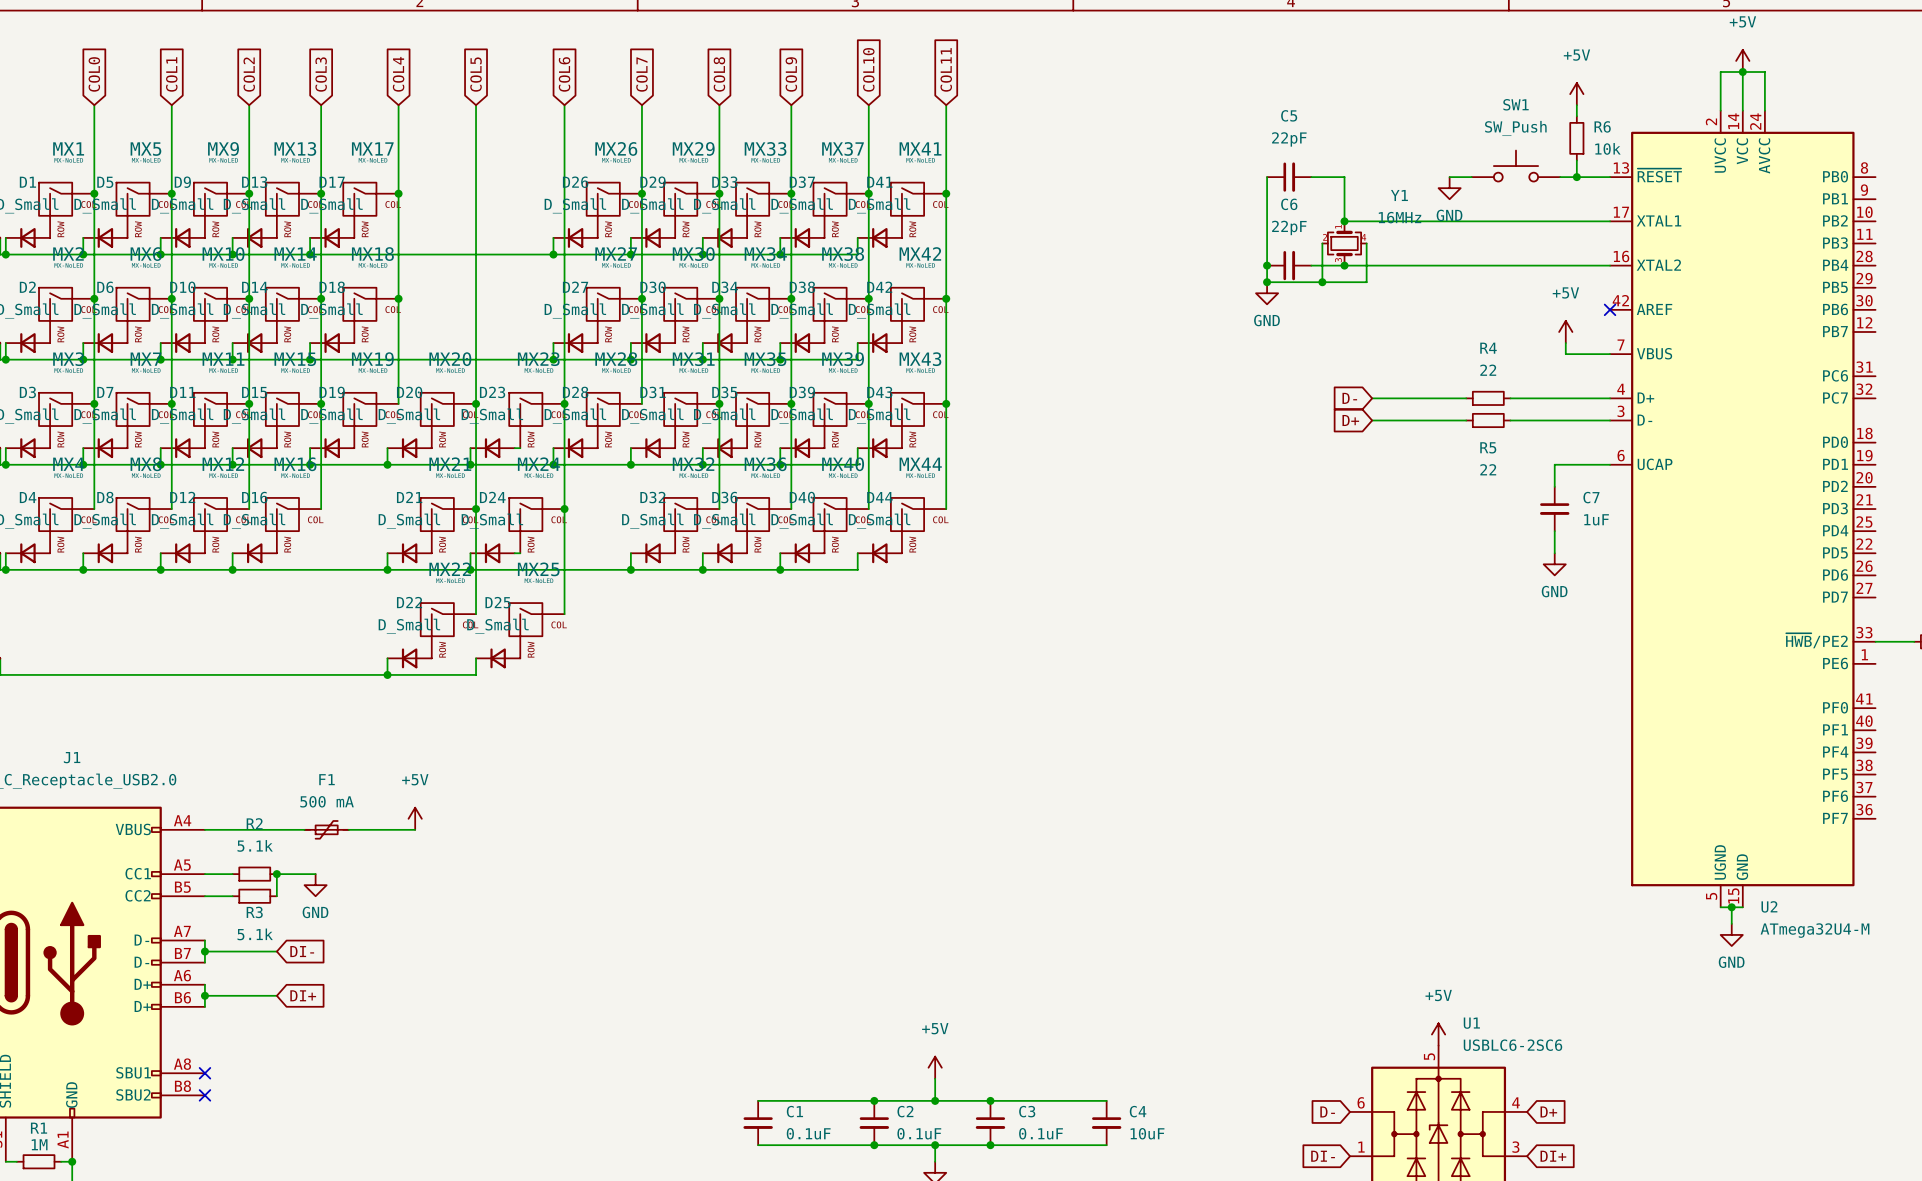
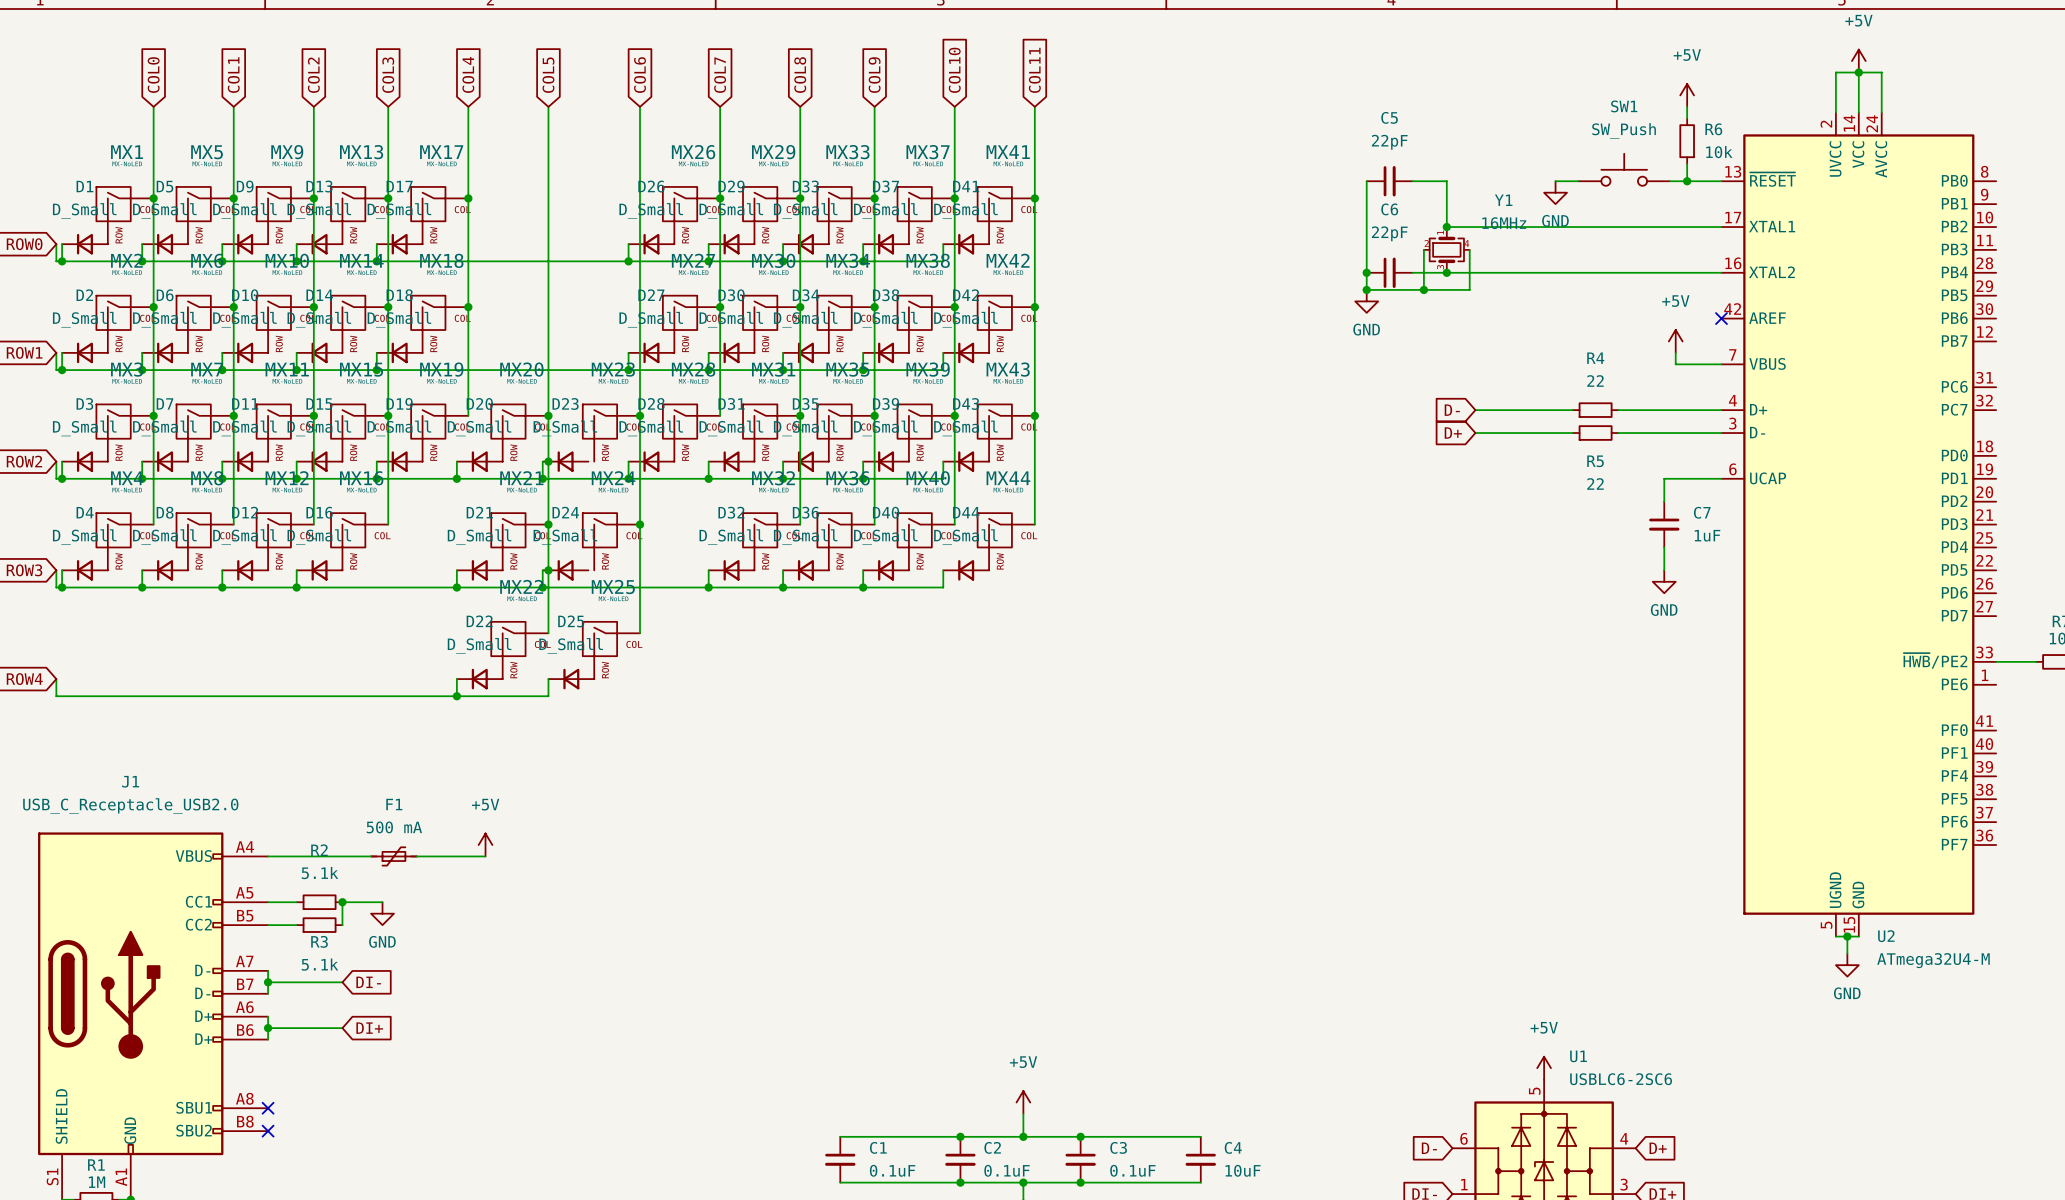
junction: none -> (548, 461)
wire: (514, 448) (520, 448) -> none
junction: none -> (548, 570)
wire: (514, 553) (520, 553) -> none

